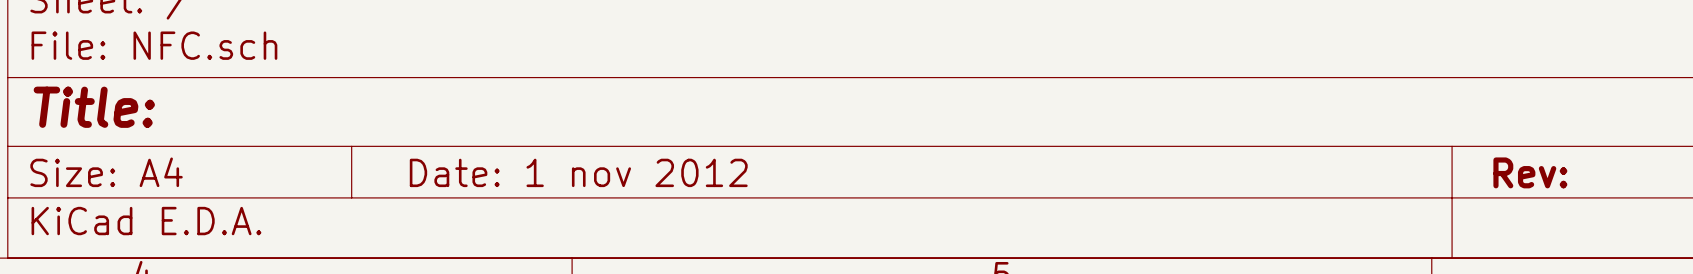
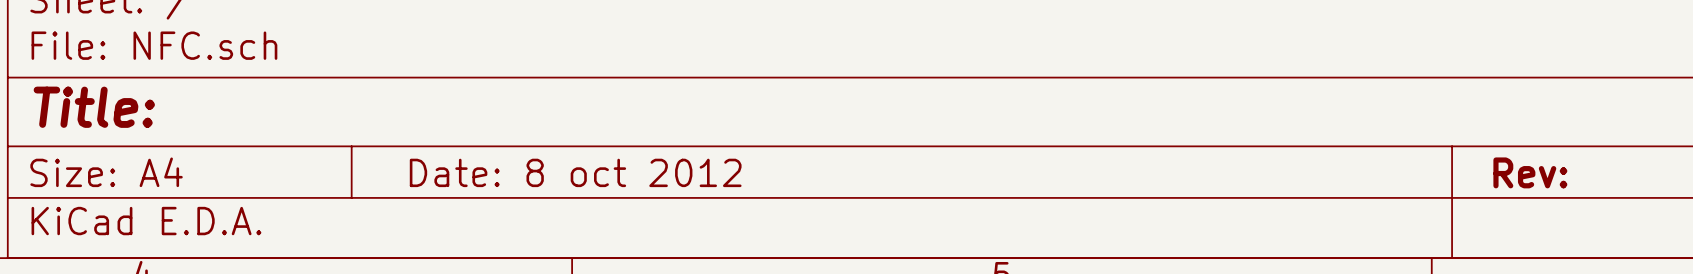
title block: Date: 1 nov 2012 (578, 172) -> Date: 8 oct 2012 (575, 172)

